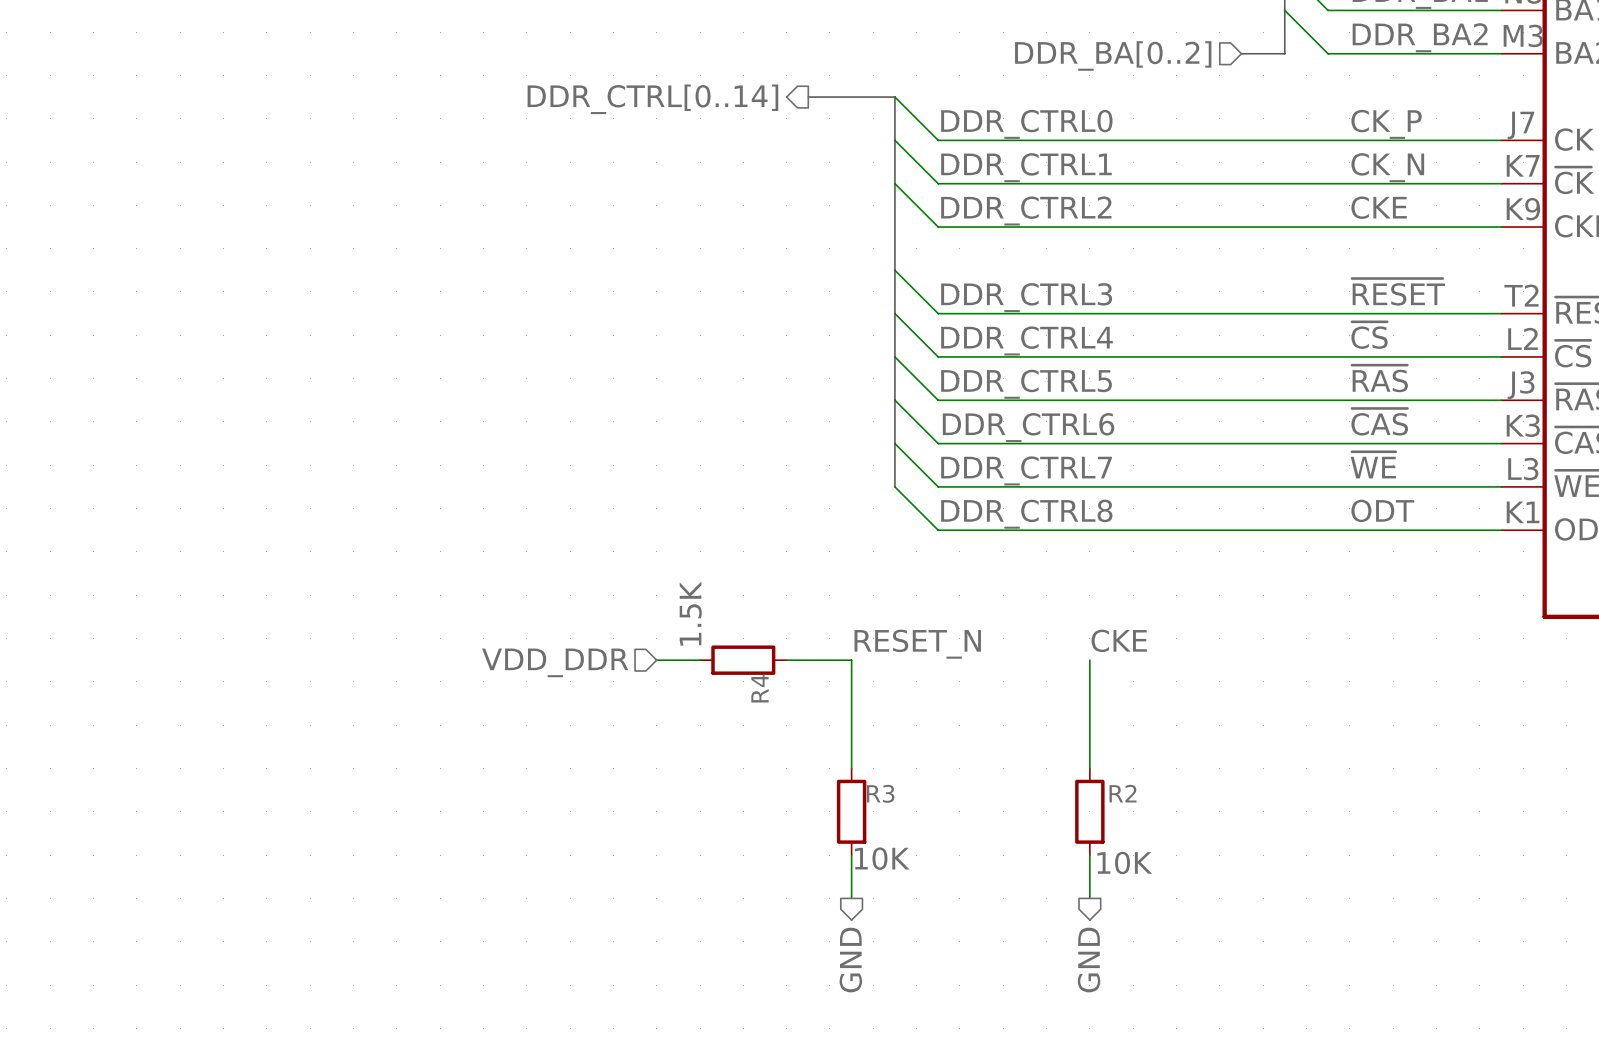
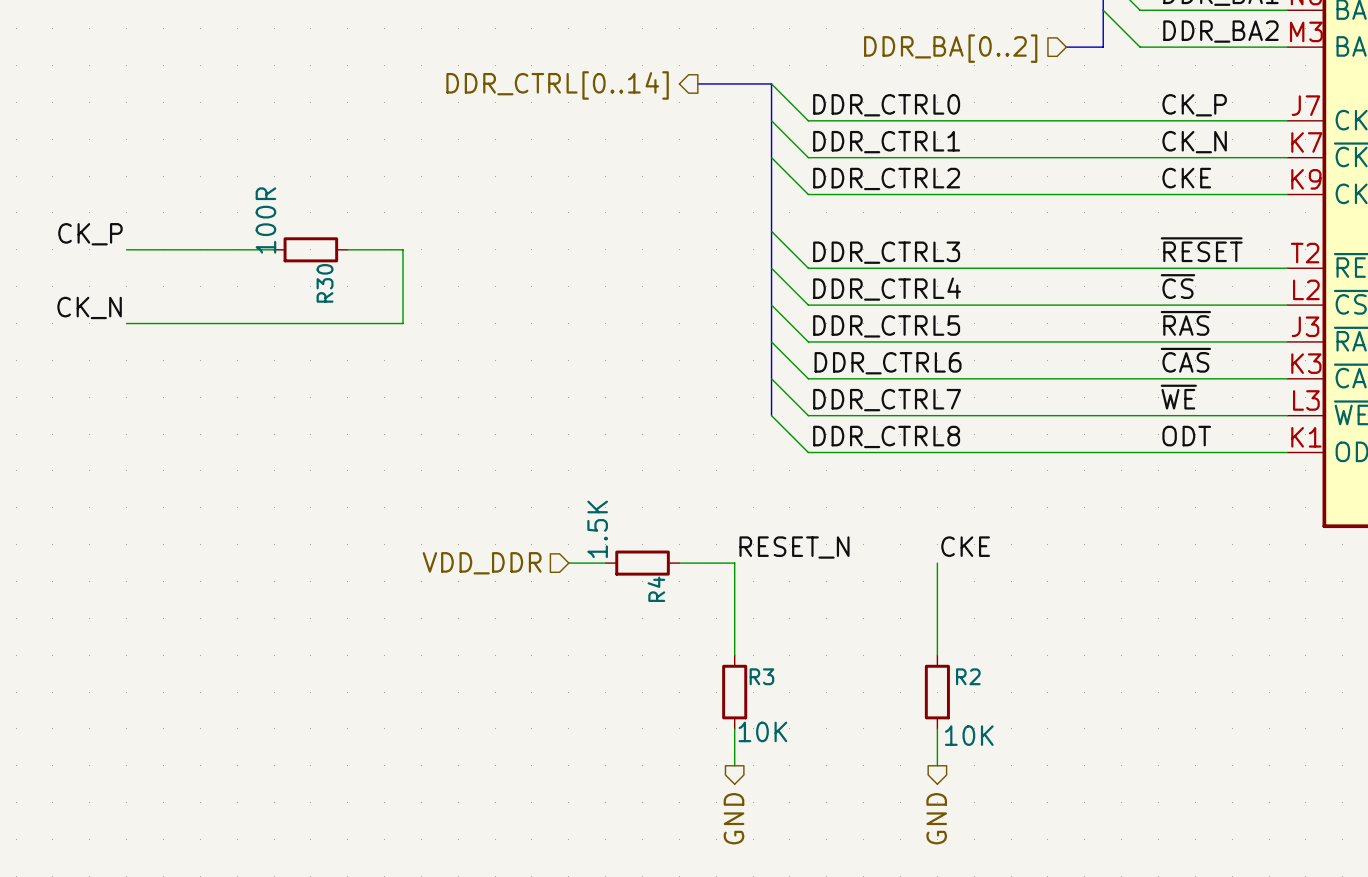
label: none -> CK_P (90, 234)
wire: none -> (126, 249) (274, 249)
R30: none -> 100R (310, 249)
wire: none -> (347, 249) (402, 249) (402, 323) (126, 323)
label: none -> CK_N (89, 307)

